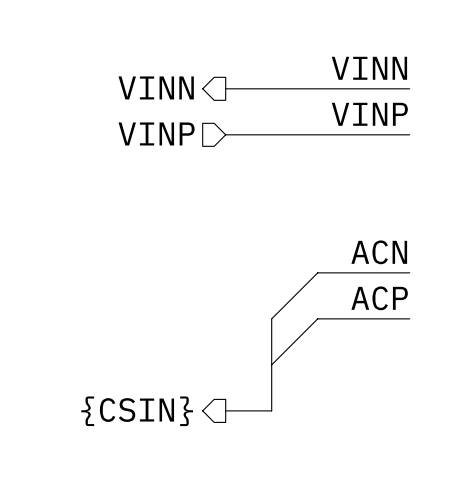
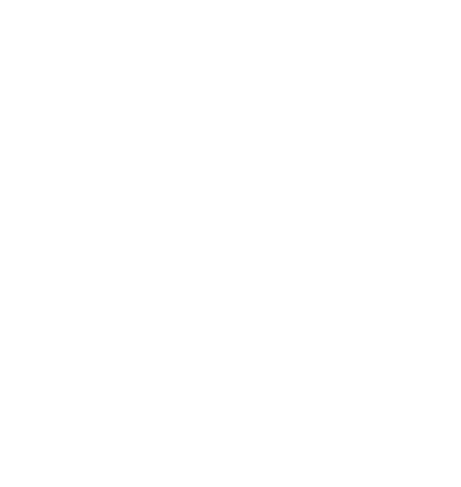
label: VINN (369, 68) -> none
hierarchical label: VINN (156, 87) -> none
wire: (225, 88) (409, 88) -> none
label: VINP (369, 114) -> none
hierarchical label: VINP (156, 133) -> none
wire: (225, 134) (409, 134) -> none
label: ACN (379, 252) -> none
wire: (409, 272) (317, 272) (271, 318) -> none
label: ACP (379, 298) -> none
bus: (271, 318) (271, 410) (225, 410) -> none
wire: (409, 318) (317, 318) (271, 364) -> none
hierarchical label: {CSIN} (137, 411) -> none

